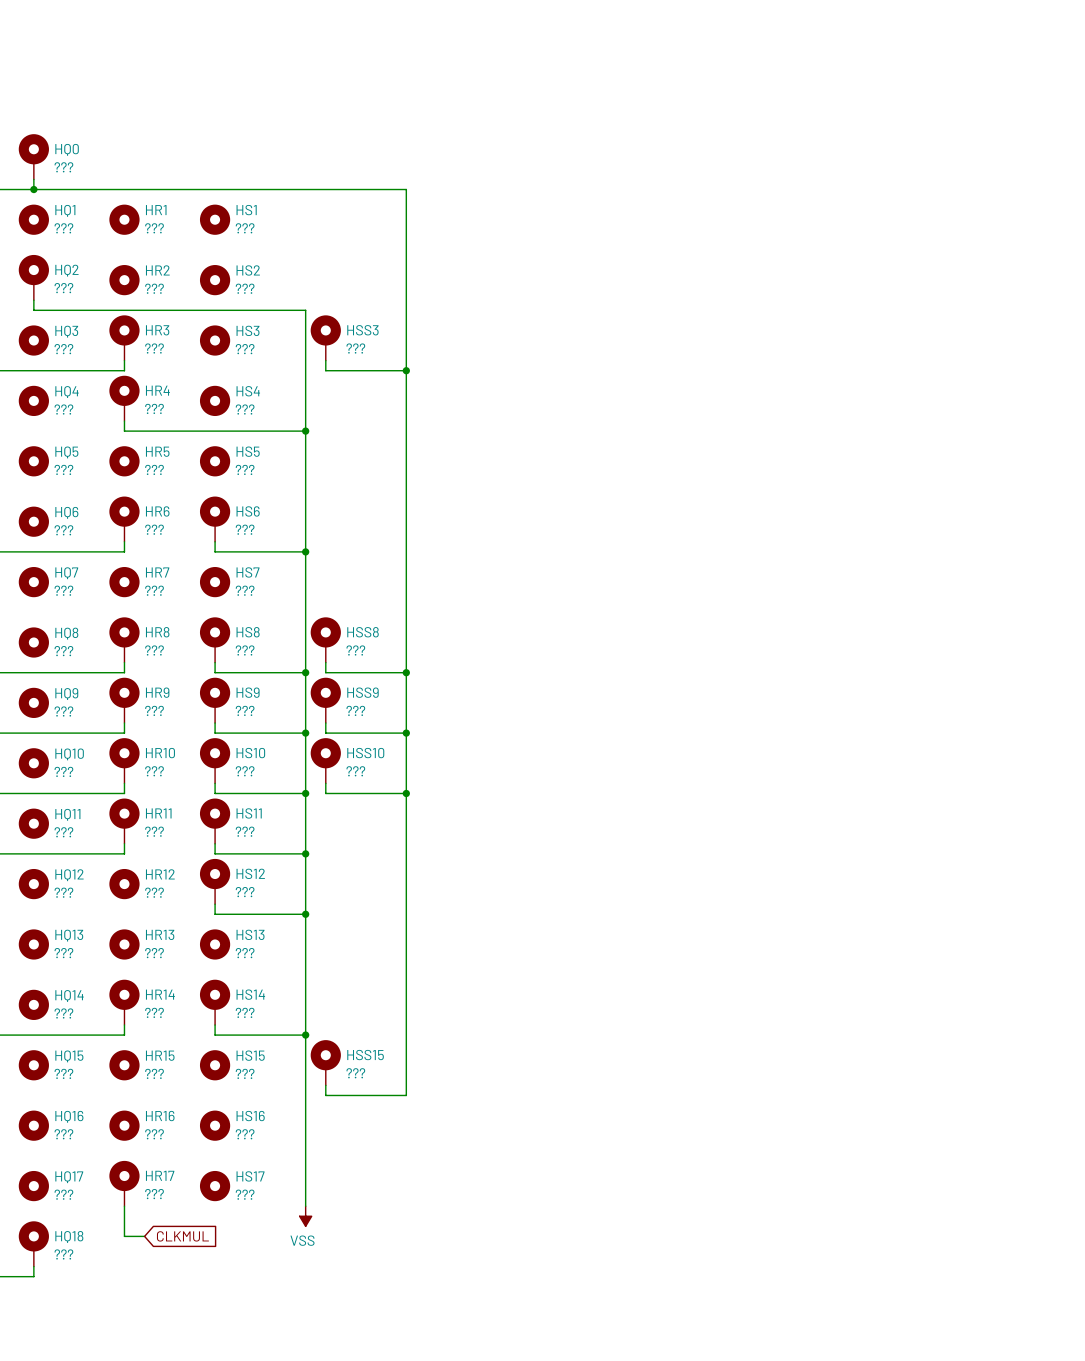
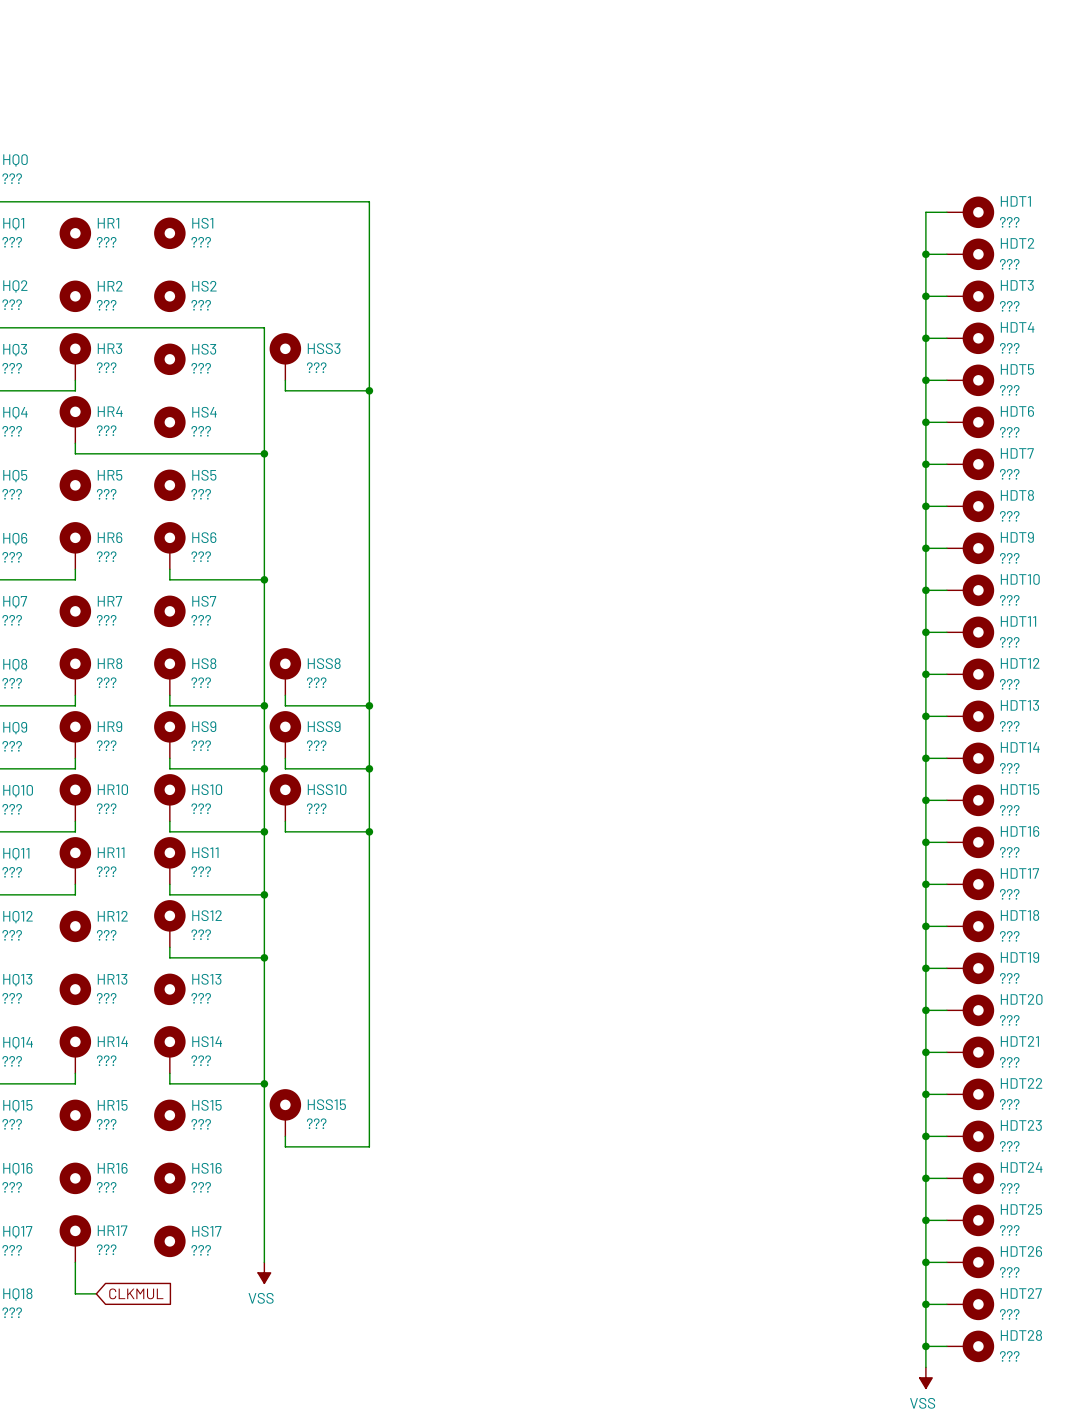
wire: none -> (946, 212) (925, 212) (925, 1367)
HDT1: none -> ??? (970, 212)
wire: none -> (925, 254) (946, 254)
junction: none -> (925, 254)
HDT2: none -> ??? (970, 254)
wire: none -> (925, 296) (946, 296)
junction: none -> (925, 296)
HDT3: none -> ??? (970, 296)
wire: none -> (925, 338) (946, 338)
junction: none -> (925, 338)
HDT4: none -> ??? (970, 338)
wire: none -> (925, 380) (946, 380)
junction: none -> (925, 380)
HDT5: none -> ??? (970, 380)
wire: none -> (925, 422) (946, 422)
junction: none -> (925, 422)
HDT6: none -> ??? (970, 422)
wire: none -> (925, 464) (946, 464)
junction: none -> (925, 464)
HDT7: none -> ??? (970, 464)
wire: none -> (925, 506) (946, 506)
junction: none -> (925, 506)
HDT8: none -> ??? (970, 506)
wire: none -> (925, 548) (946, 548)
junction: none -> (925, 548)
HDT9: none -> ??? (970, 548)
wire: none -> (925, 590) (946, 590)
junction: none -> (925, 590)
HDT10: none -> ??? (970, 590)
wire: none -> (925, 632) (946, 632)
junction: none -> (925, 632)
HDT11: none -> ??? (970, 632)
wire: none -> (925, 674) (946, 674)
junction: none -> (925, 674)
HDT12: none -> ??? (970, 674)
wire: none -> (925, 716) (946, 716)
junction: none -> (925, 716)
HDT13: none -> ??? (970, 716)
wire: none -> (925, 758) (946, 758)
junction: none -> (925, 758)
HDT14: none -> ??? (970, 758)
wire: none -> (925, 800) (946, 800)
junction: none -> (925, 800)
HDT15: none -> ??? (970, 800)
wire: none -> (925, 842) (946, 842)
junction: none -> (925, 842)
HDT16: none -> ??? (970, 842)
wire: none -> (925, 884) (946, 884)
junction: none -> (925, 884)
HDT17: none -> ??? (970, 884)
wire: none -> (925, 926) (946, 926)
junction: none -> (925, 926)
HDT18: none -> ??? (970, 926)
wire: none -> (925, 968) (946, 968)
junction: none -> (925, 968)
HDT19: none -> ??? (970, 968)
wire: none -> (925, 1010) (946, 1010)
junction: none -> (925, 1010)
HDT20: none -> ??? (970, 1010)
wire: none -> (925, 1052) (946, 1052)
junction: none -> (925, 1052)
HDT21: none -> ??? (970, 1052)
wire: none -> (925, 1094) (946, 1094)
junction: none -> (925, 1094)
HDT22: none -> ??? (970, 1094)
wire: none -> (925, 1136) (946, 1136)
junction: none -> (925, 1136)
HDT23: none -> ??? (970, 1136)
wire: none -> (925, 1178) (946, 1178)
junction: none -> (925, 1178)
HDT24: none -> ??? (970, 1178)
wire: none -> (925, 1220) (946, 1220)
junction: none -> (925, 1220)
HDT25: none -> ??? (970, 1220)
wire: none -> (925, 1262) (946, 1262)
junction: none -> (925, 1262)
HDT26: none -> ??? (970, 1262)
wire: none -> (925, 1304) (946, 1304)
junction: none -> (925, 1304)
HDT27: none -> ??? (970, 1304)
wire: none -> (925, 1346) (946, 1346)
junction: none -> (925, 1346)
HDT28: none -> ??? (970, 1346)
power symbol: none -> VSS (925, 1377)

